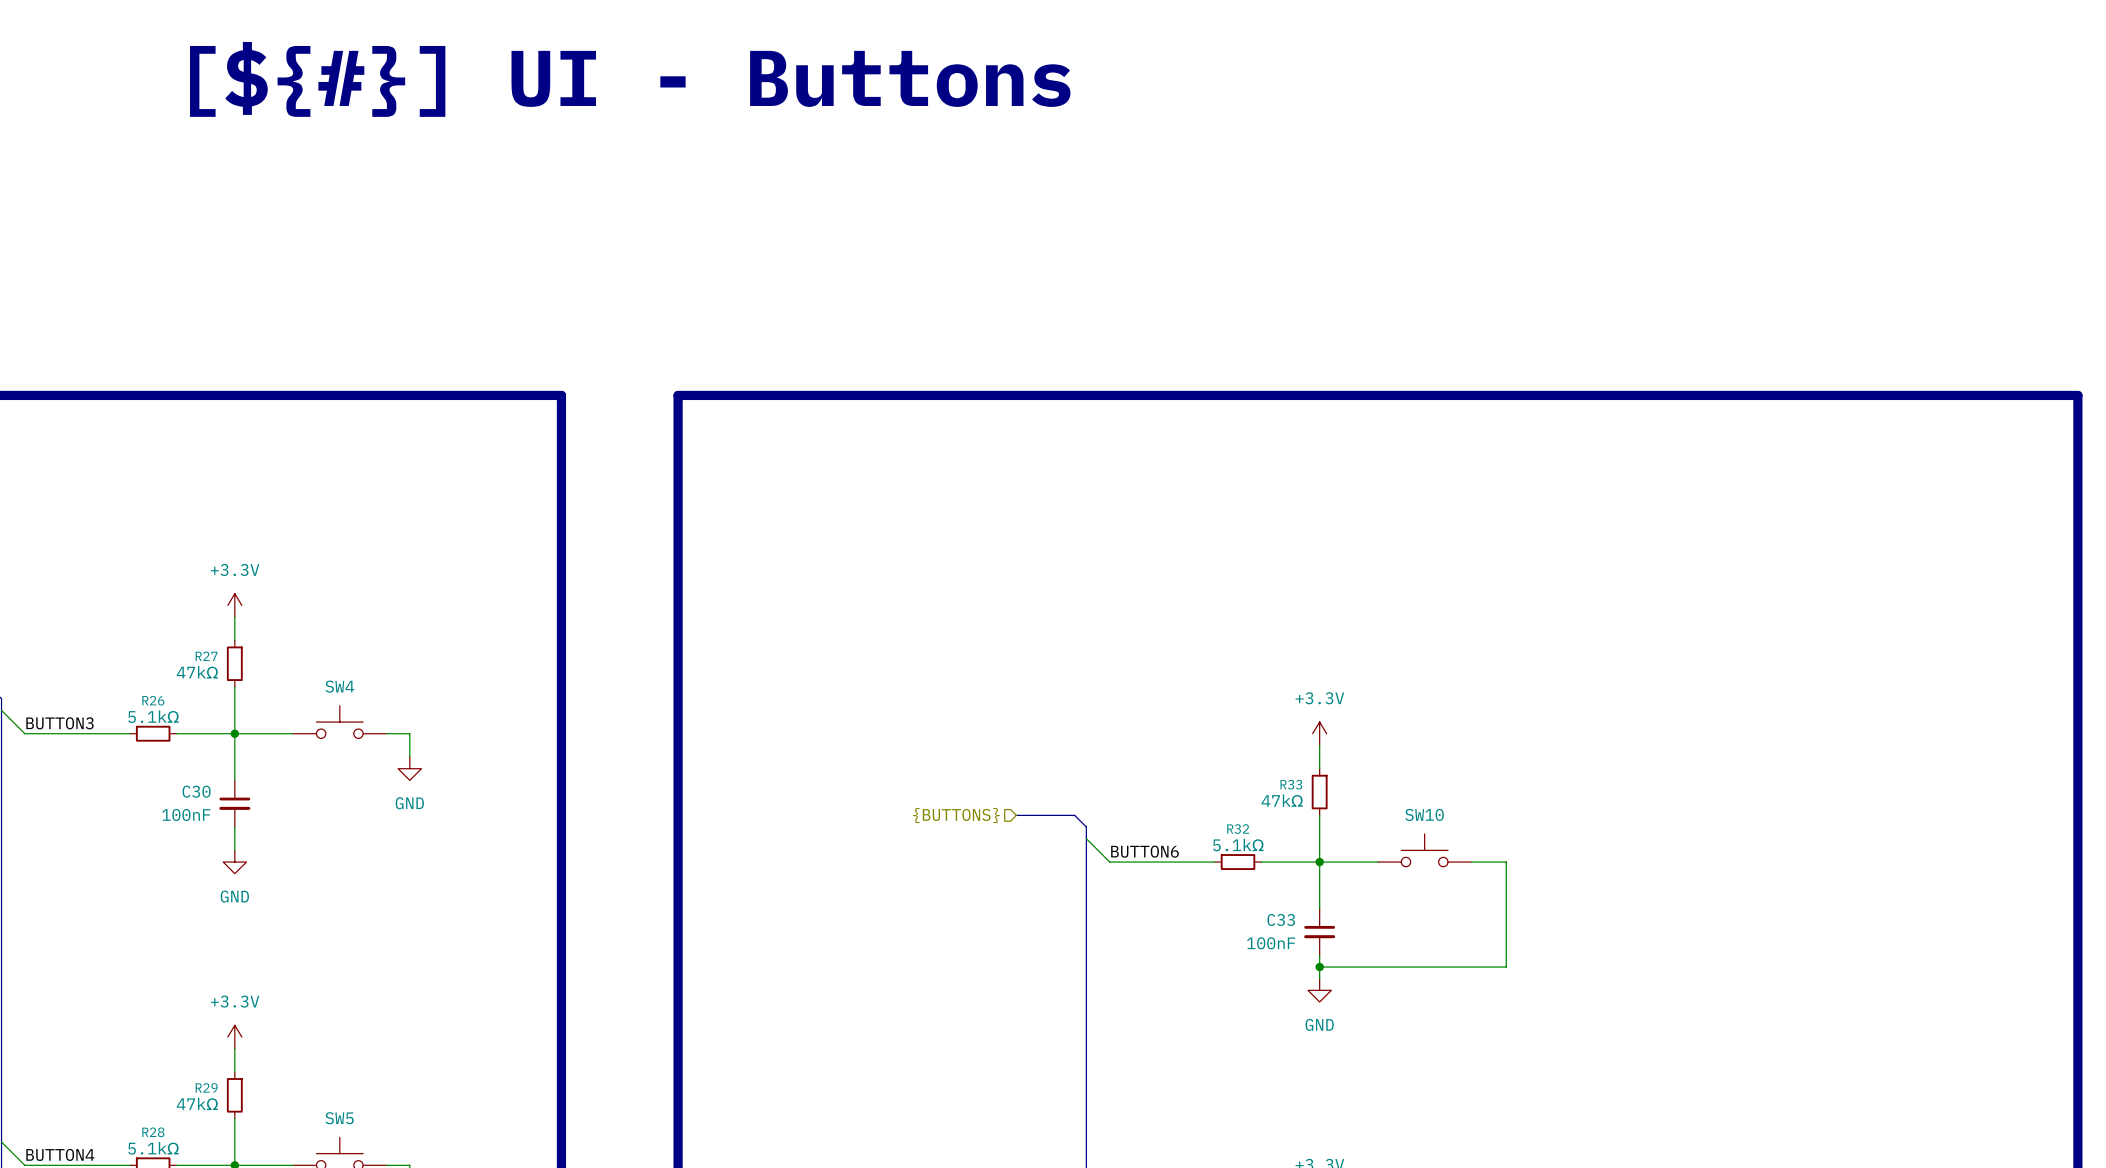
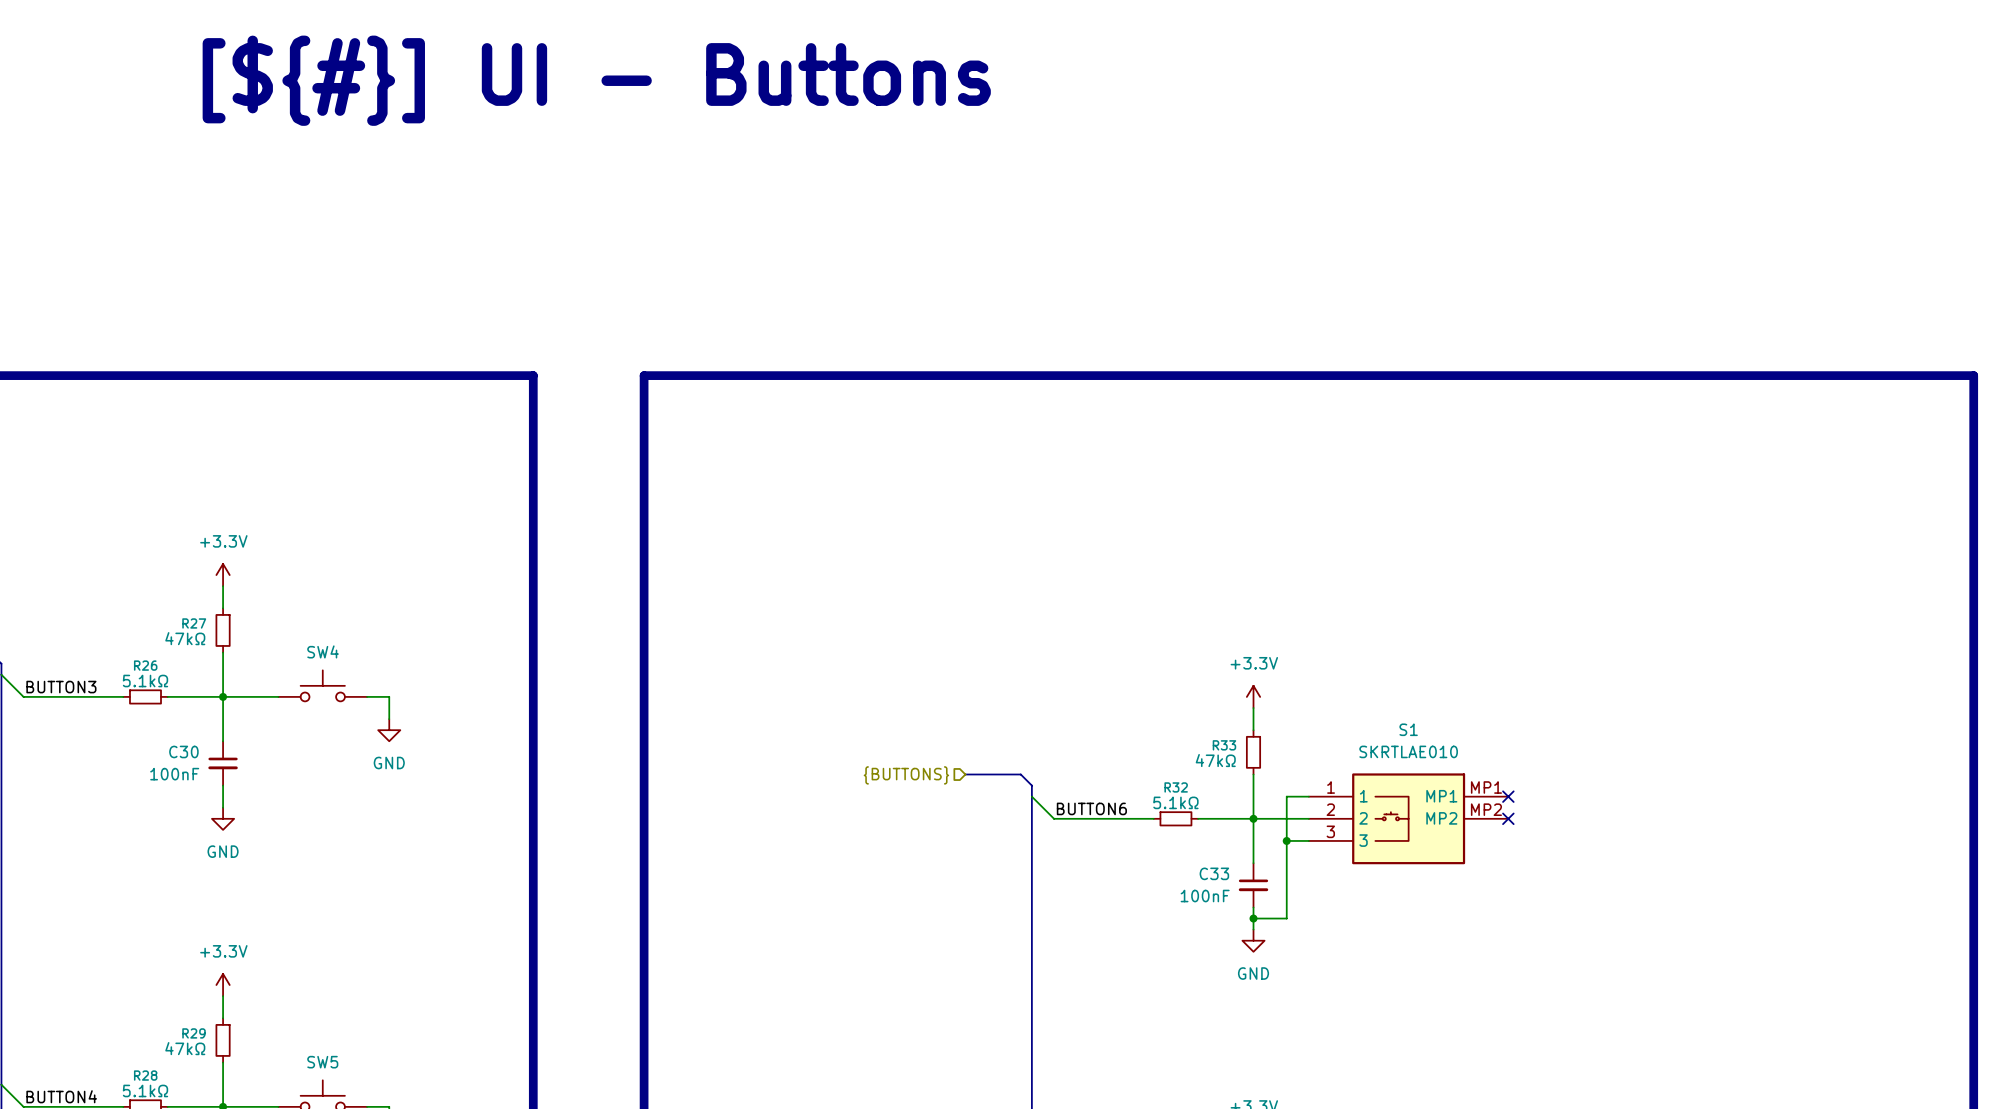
no-connect mark: none -> (1508, 796)
SW10: (1424, 850) -> none
wire: (1471, 862) (1506, 862) (1506, 967) (1354, 967) -> (1308, 796) (1286, 796) (1286, 918)
S1: none -> SKRTLAE010 (1408, 818)
no-connect mark: none -> (1508, 818)
wire: none -> (1286, 840) (1308, 840)
junction: none -> (1286, 840)

